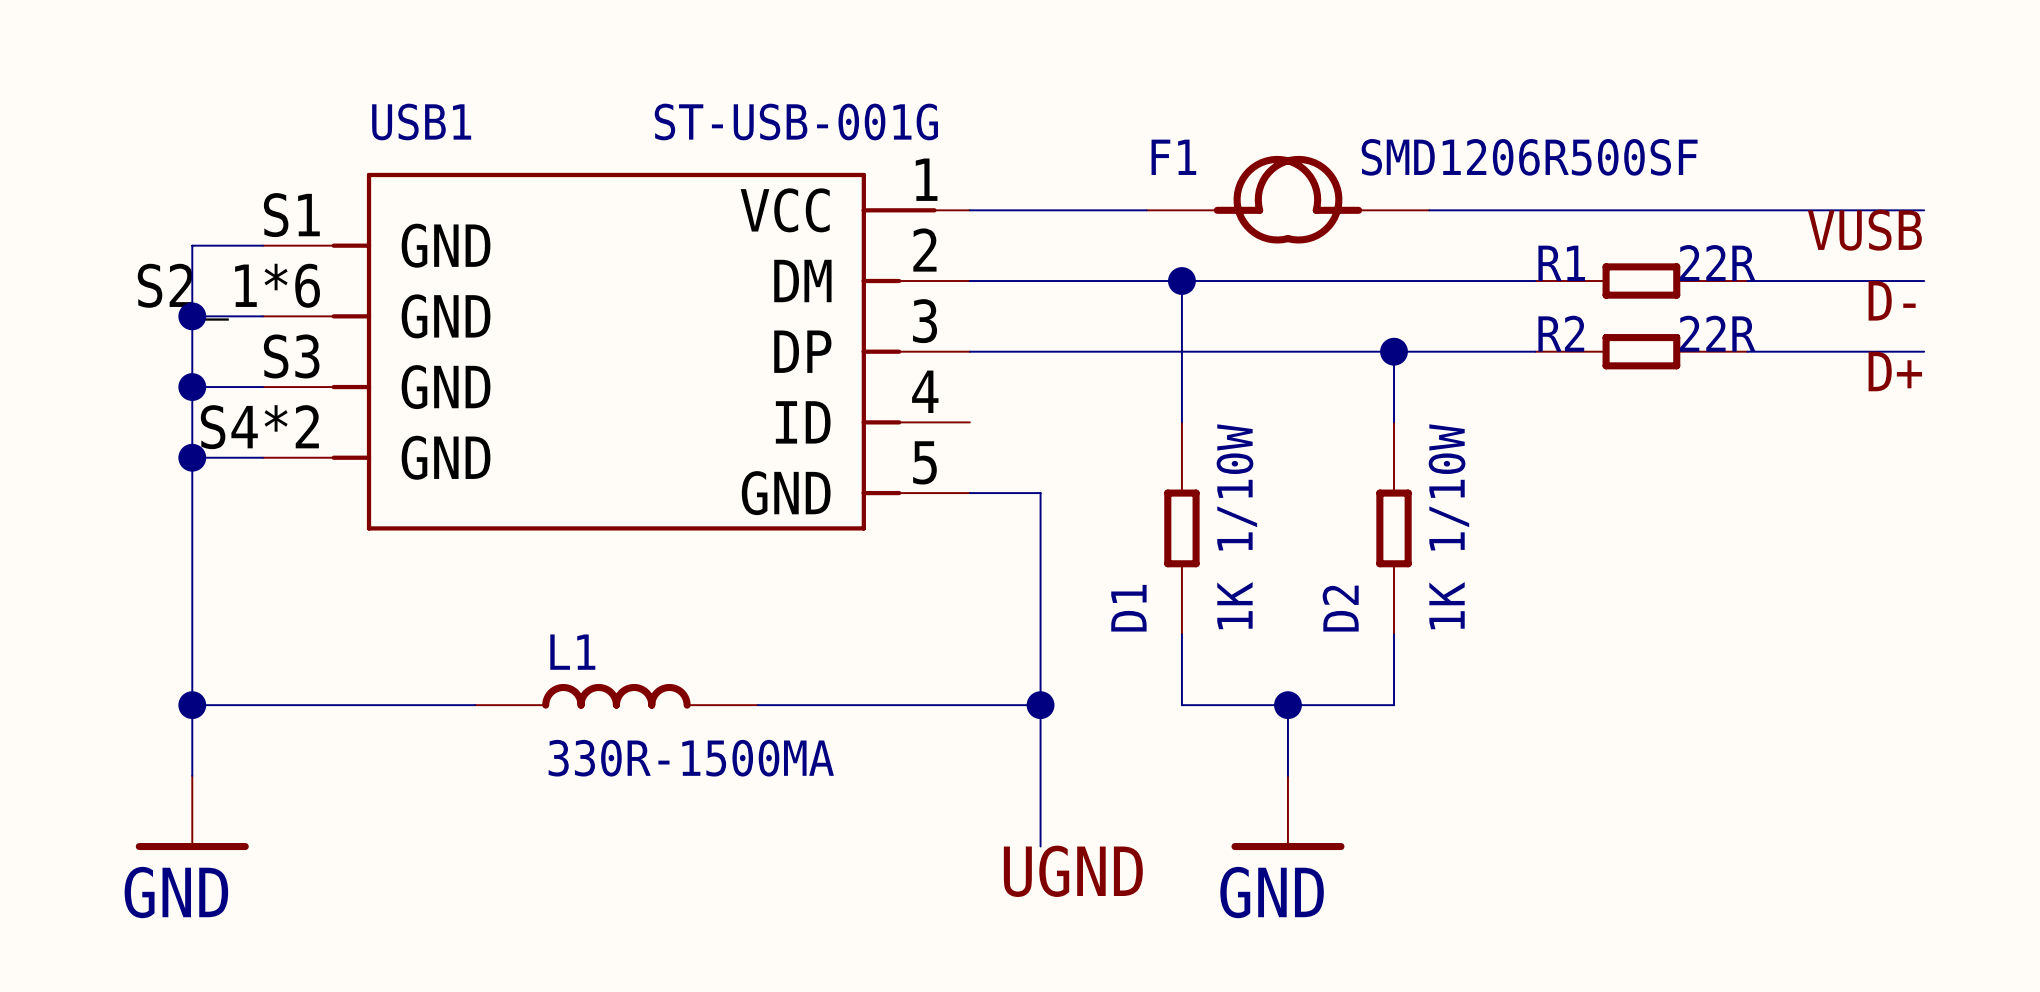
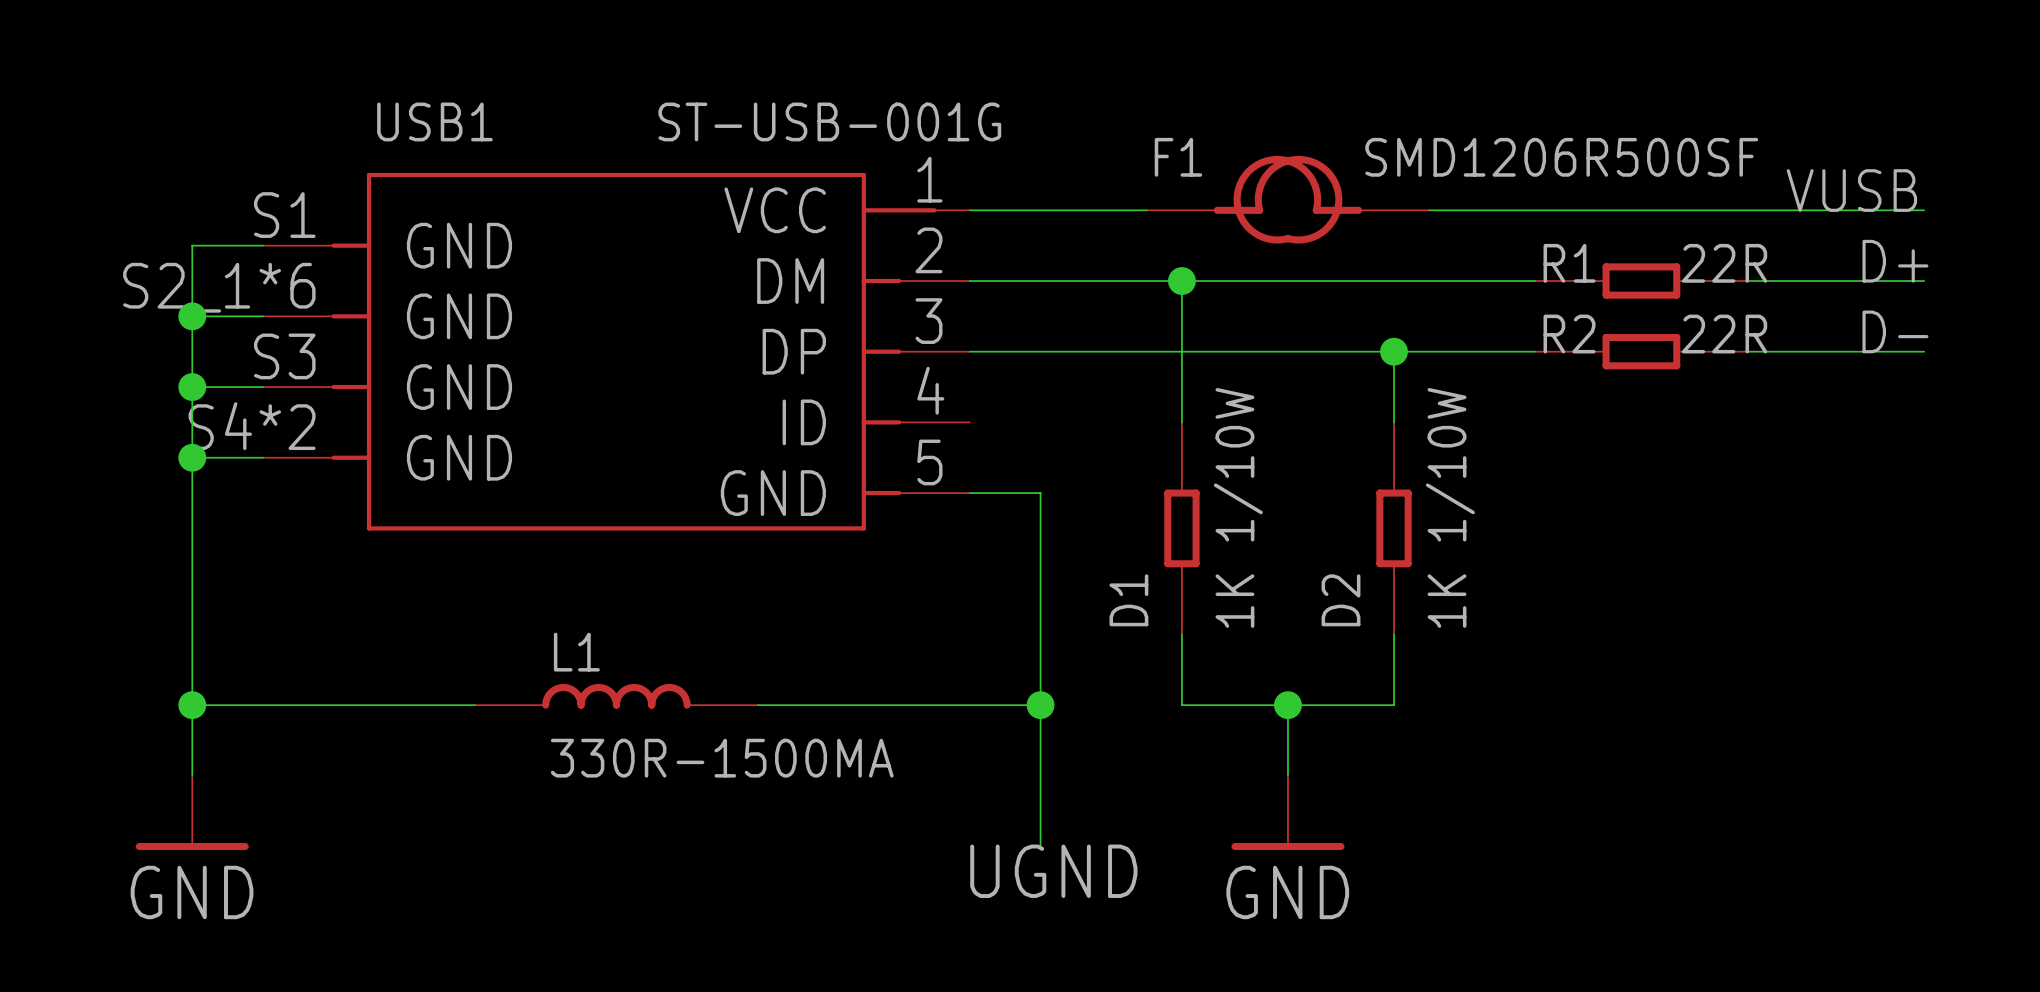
label position: VUSB (1864, 230) -> VUSB (1851, 190)
label position: D- (1892, 300) -> D- (1895, 331)
label position: D+ (1895, 371) -> D+ (1895, 261)

